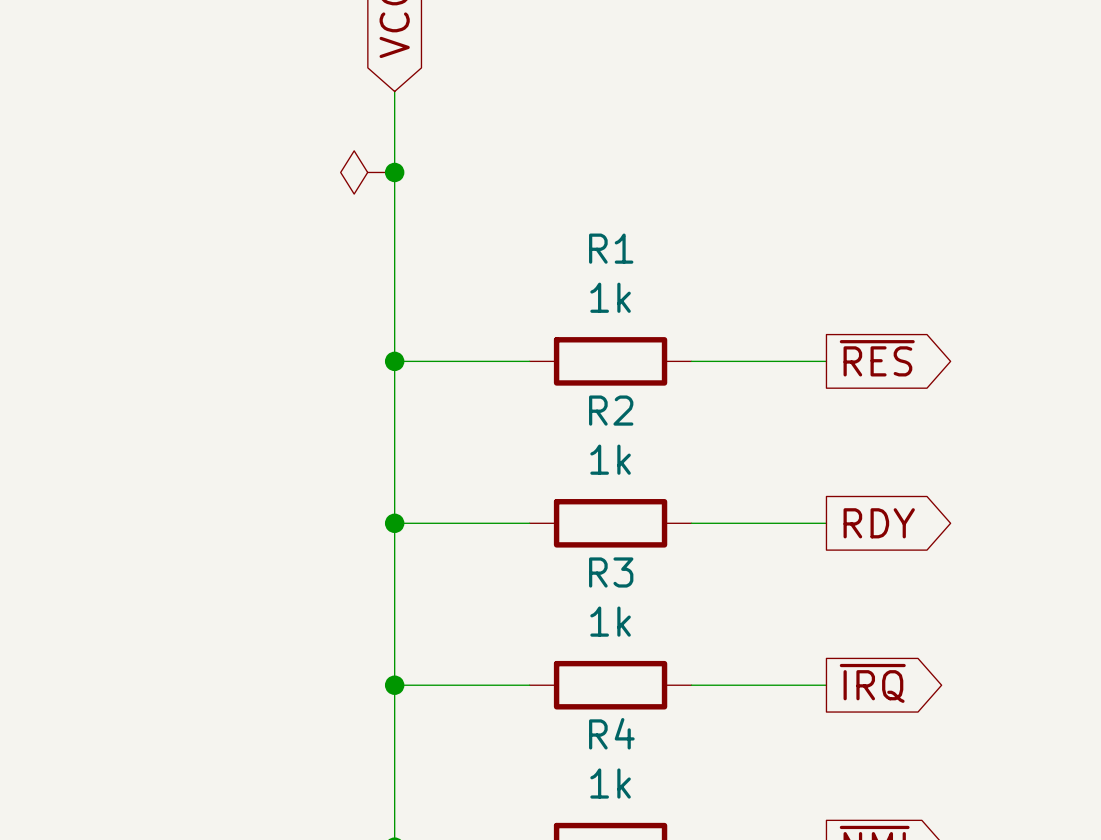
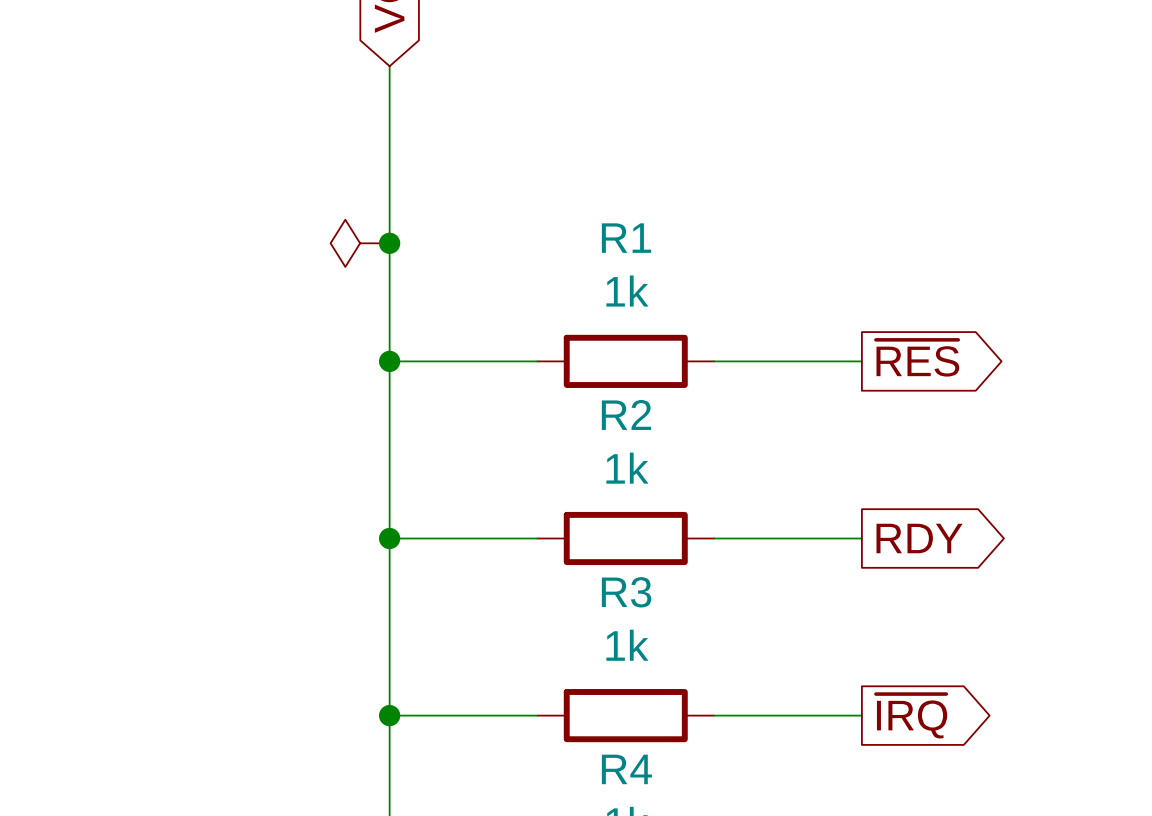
power symbol position: (367, 172) -> (360, 243)
junction position: (394, 172) -> (389, 243)

